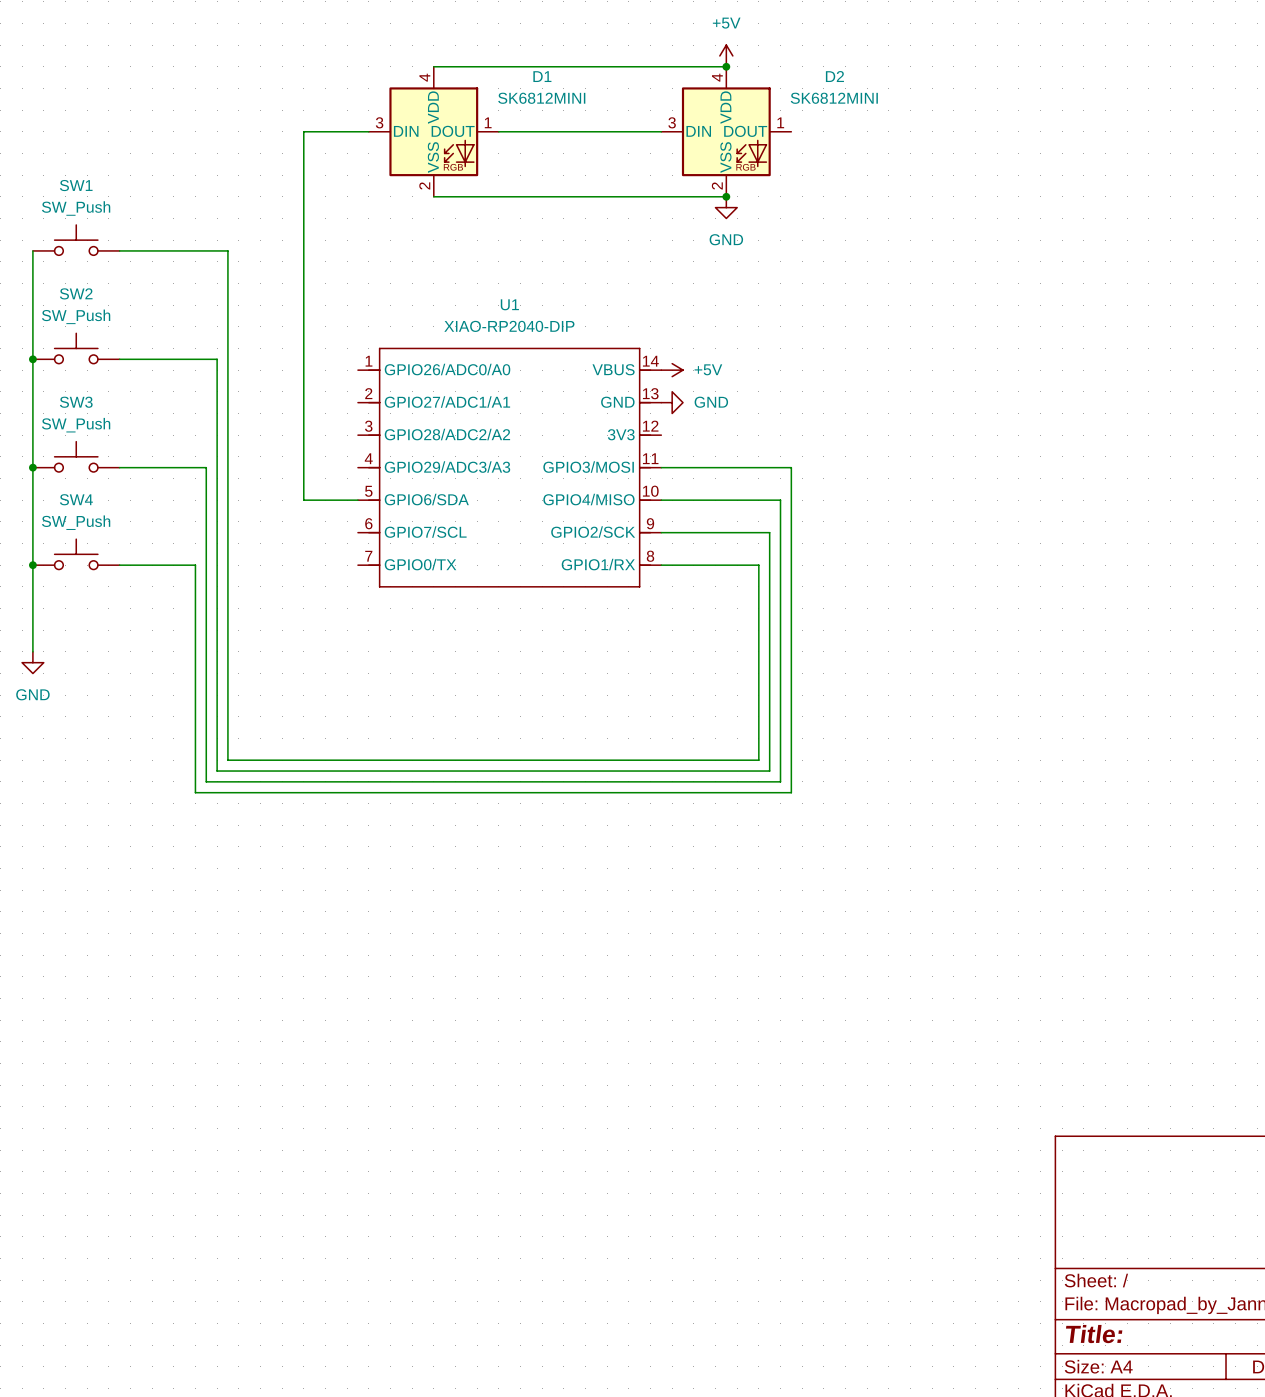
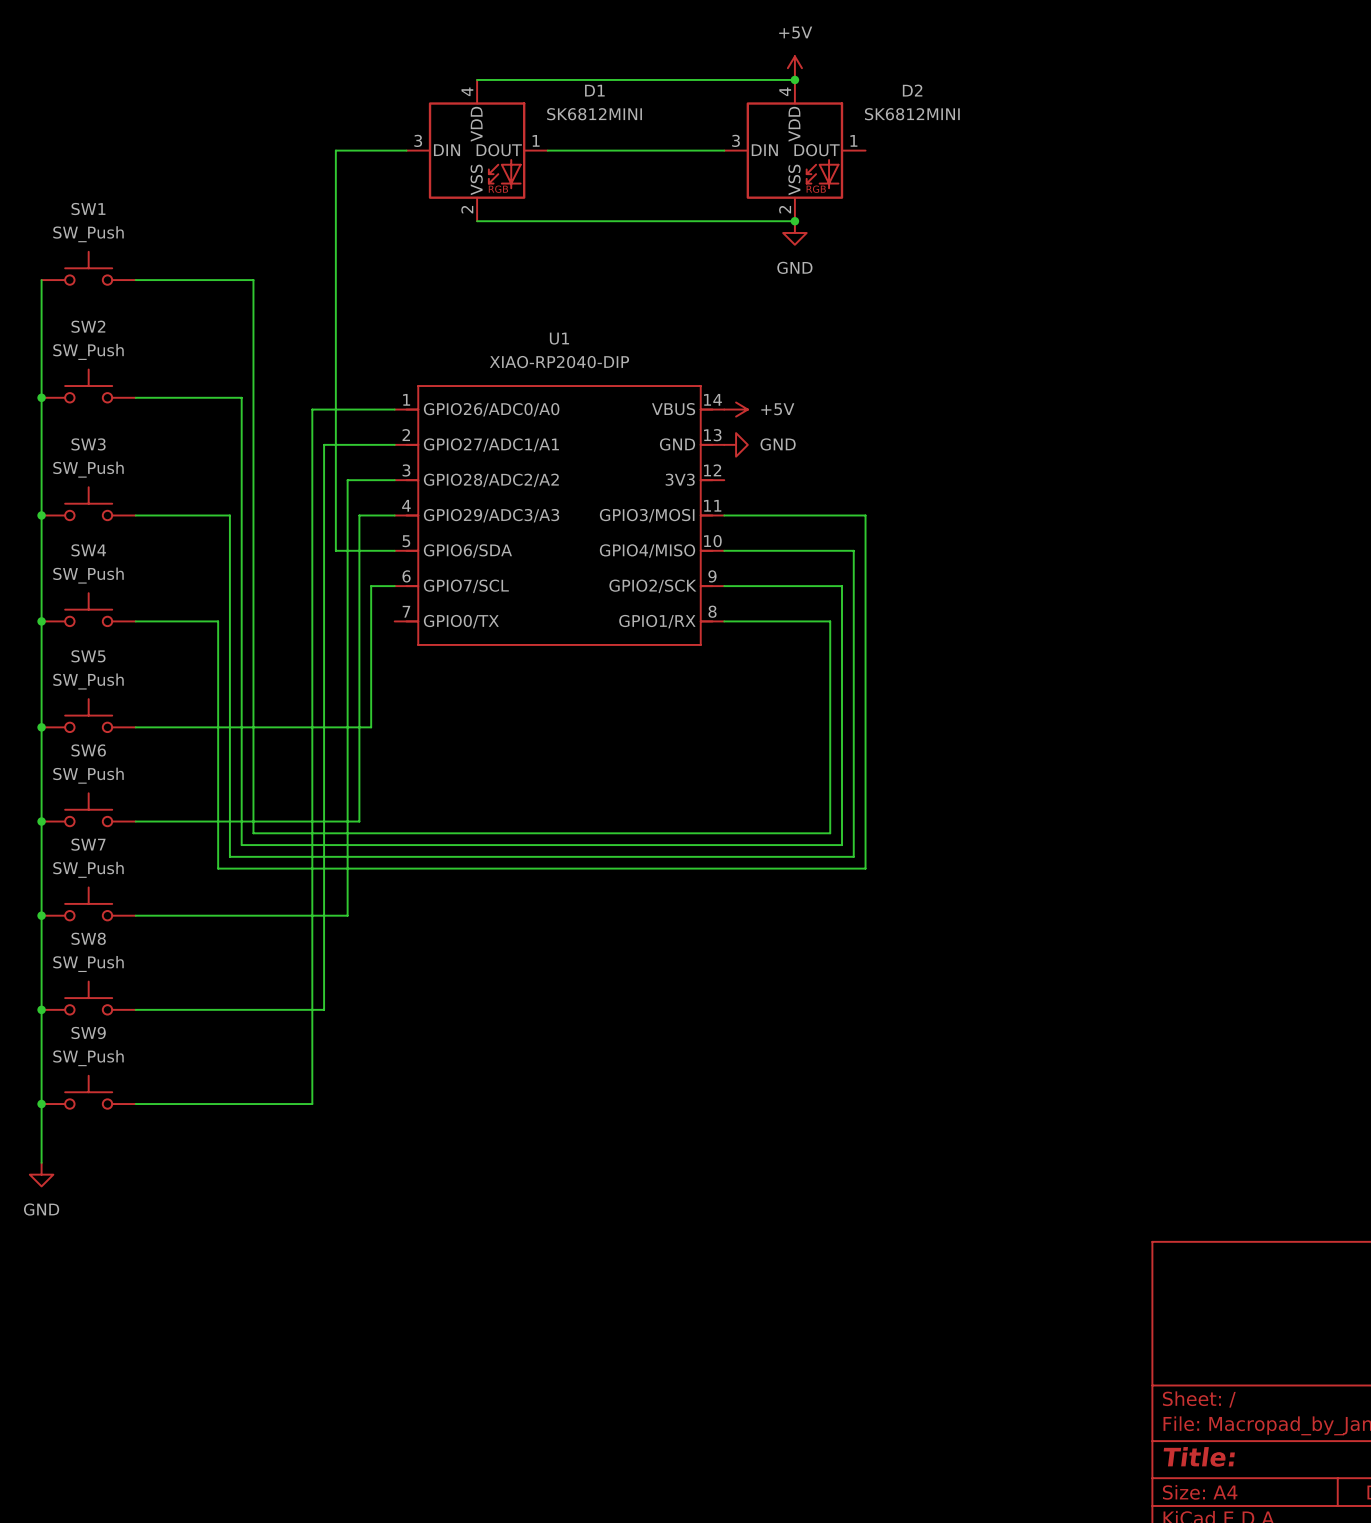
wire: none -> (394, 409) (312, 409) (312, 1104) (135, 1104)
wire: none -> (394, 444) (324, 444) (324, 1009) (135, 1009)
wire: none -> (394, 480) (347, 480) (347, 915) (135, 915)
wire: none -> (394, 515) (359, 515) (359, 821) (135, 821)
wire: none -> (394, 586) (371, 586) (371, 727) (135, 727)
wire: none -> (41, 715) (41, 1162)
SW5: none -> SW_Push (88, 715)
power symbol: GND (32, 662) -> none
junction: none -> (41, 727)
SW6: none -> SW_Push (88, 809)
junction: none -> (41, 821)
SW7: none -> SW_Push (88, 903)
junction: none -> (41, 915)
SW8: none -> SW_Push (88, 998)
junction: none -> (41, 1009)
SW9: none -> SW_Push (88, 1092)
junction: none -> (41, 1104)
power symbol: none -> GND (41, 1174)

